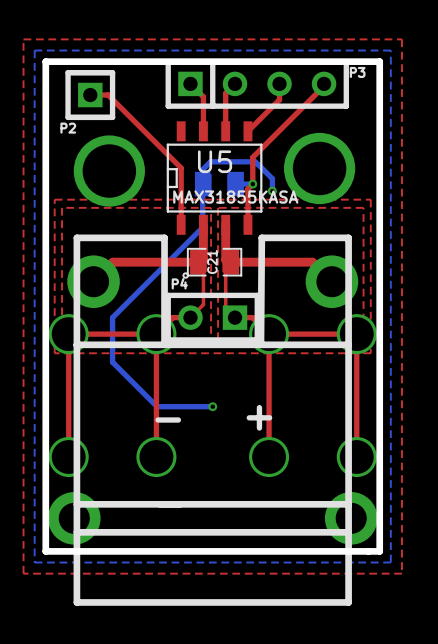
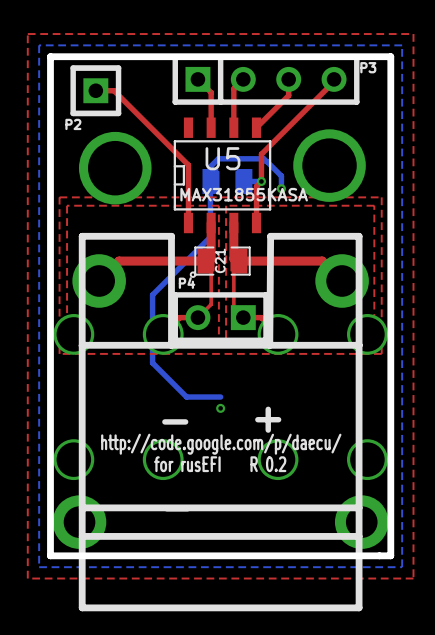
bottom track: (202, 227) (112, 317) (112, 362) (157, 406) (212, 406) -> (210, 225) (210, 237) (152, 294) (152, 362) (186, 397) (220, 397)
text: none -> http://code.google.com/p/daecu/ (221, 444)
top track: (68, 457) (68, 334) (156, 334) (156, 457) -> none
top track: (269, 457) (269, 334) (356, 334) (356, 457) -> none
text: none -> for rusEFI R 0.2 (220, 464)

